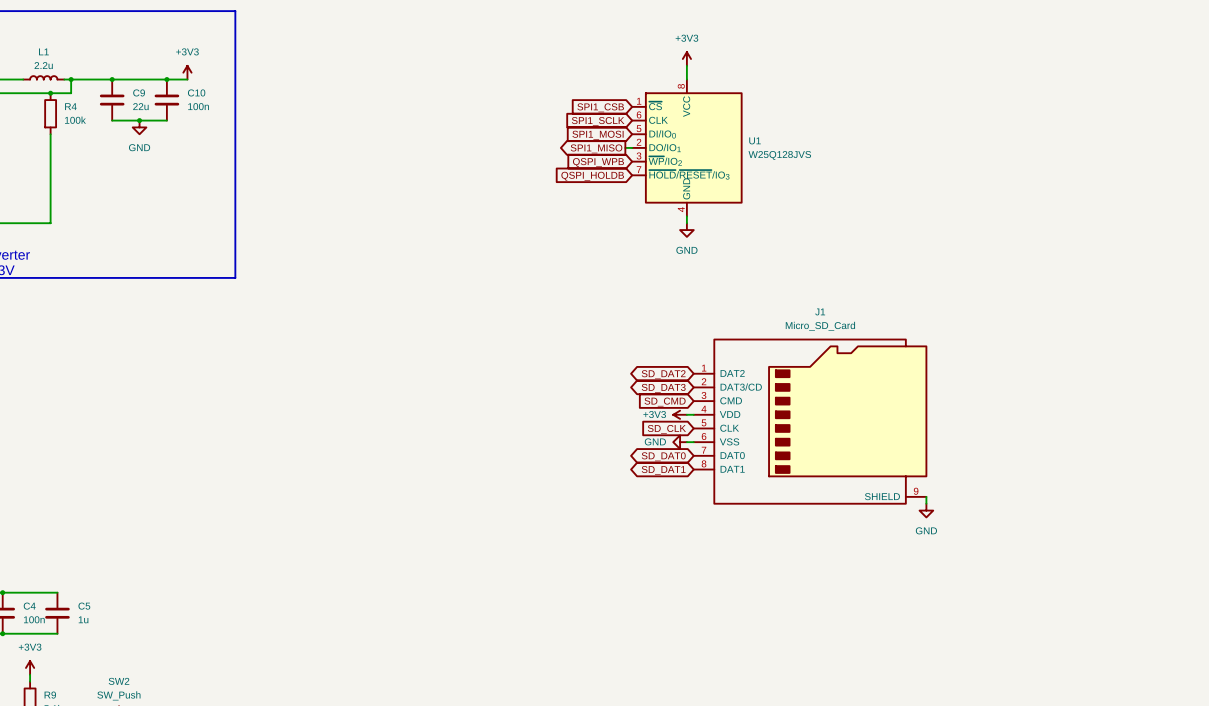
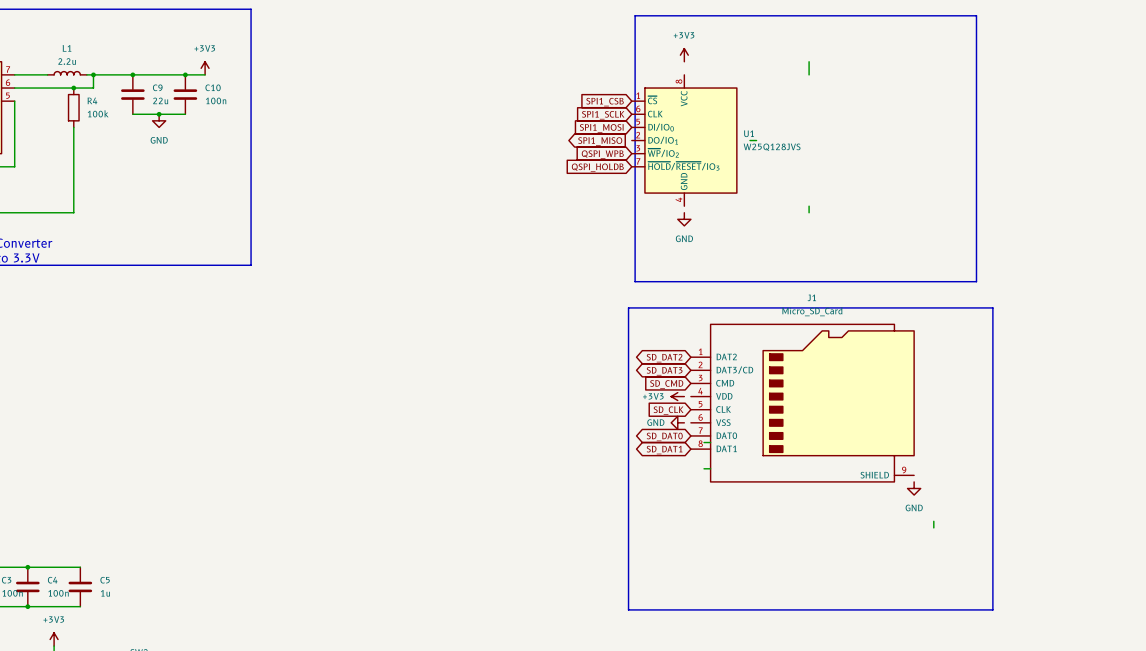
line: none -> (635, 15) (976, 15) (976, 281) (635, 281) (635, 15)
wire: (686, 65) (686, 79) -> (809, 61) (809, 74)
wire: (625, 147) (632, 147) -> (749, 140) (756, 140)
wire: (686, 216) (686, 223) -> (809, 206) (809, 212)
line: none -> (628, 307) (992, 307) (992, 609) (628, 609) (628, 307)
wire: (686, 414) (693, 414) -> (704, 442) (710, 442)
wire: (686, 442) (693, 442) -> (704, 468) (710, 468)
wire: (926, 496) (926, 503) -> (933, 521) (933, 527)

